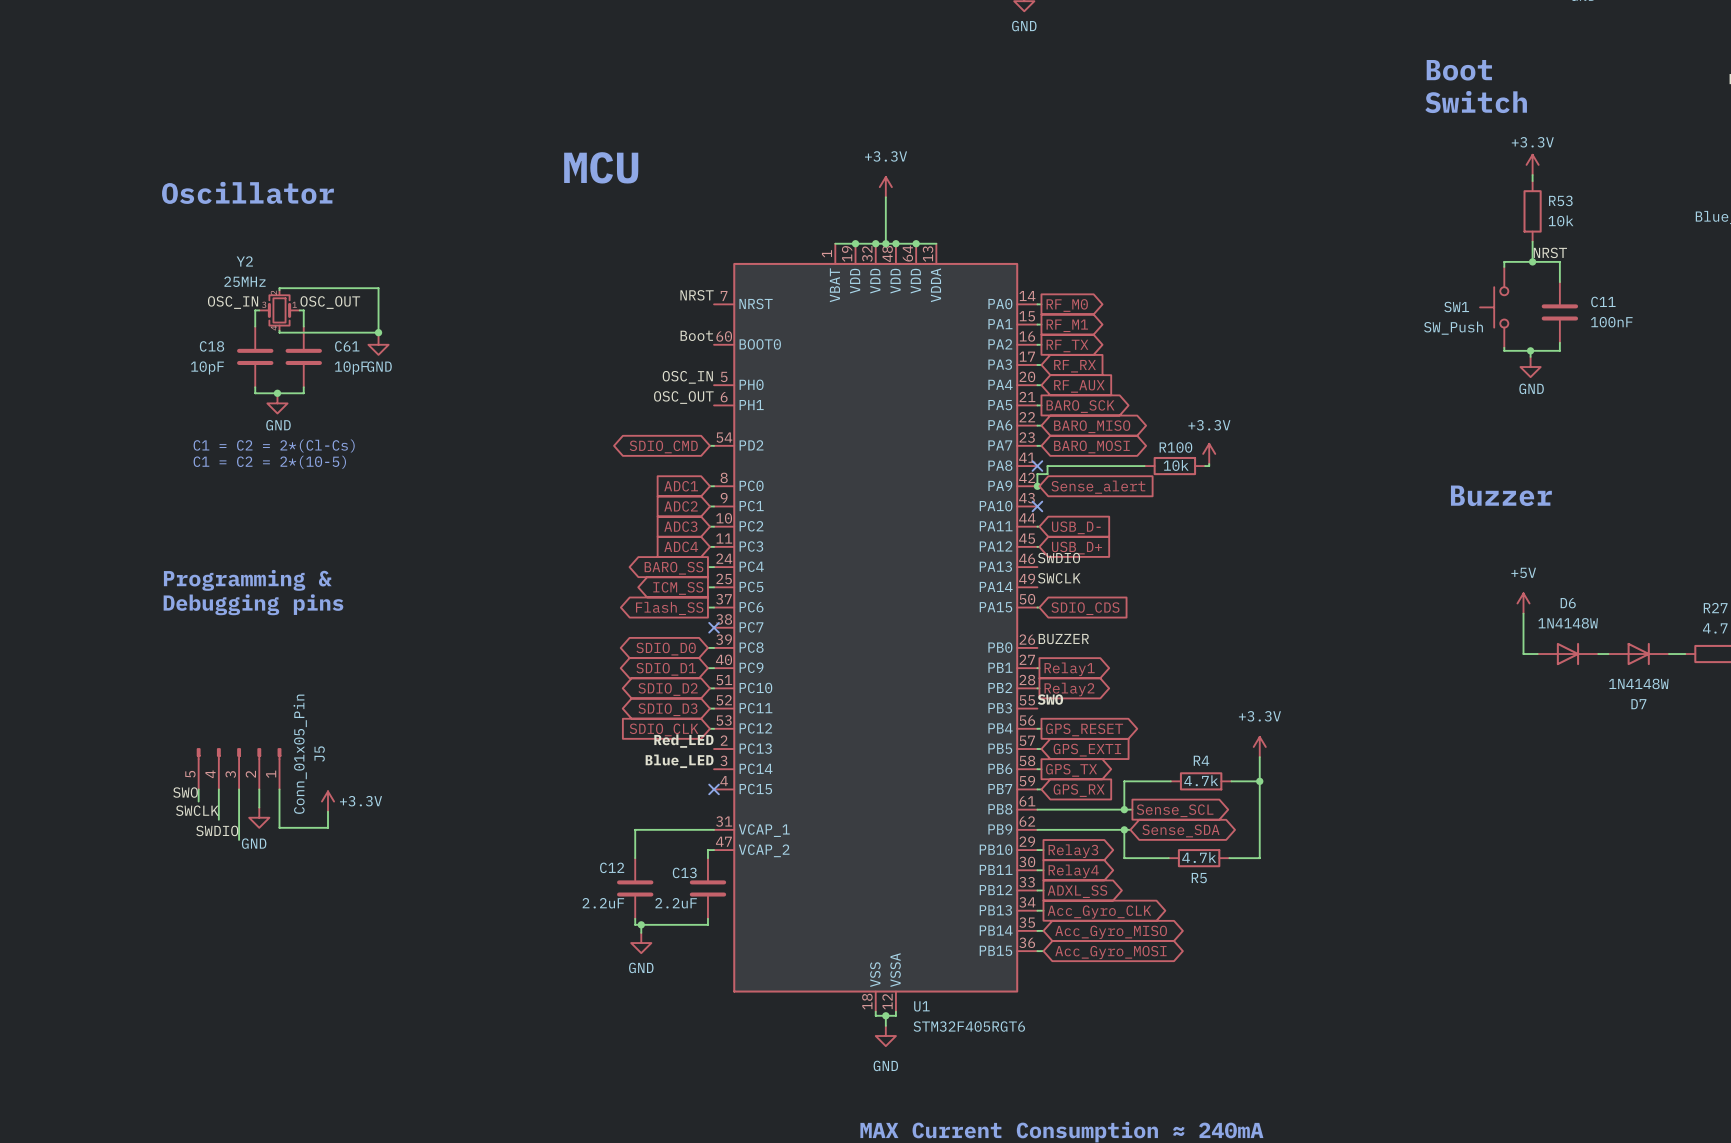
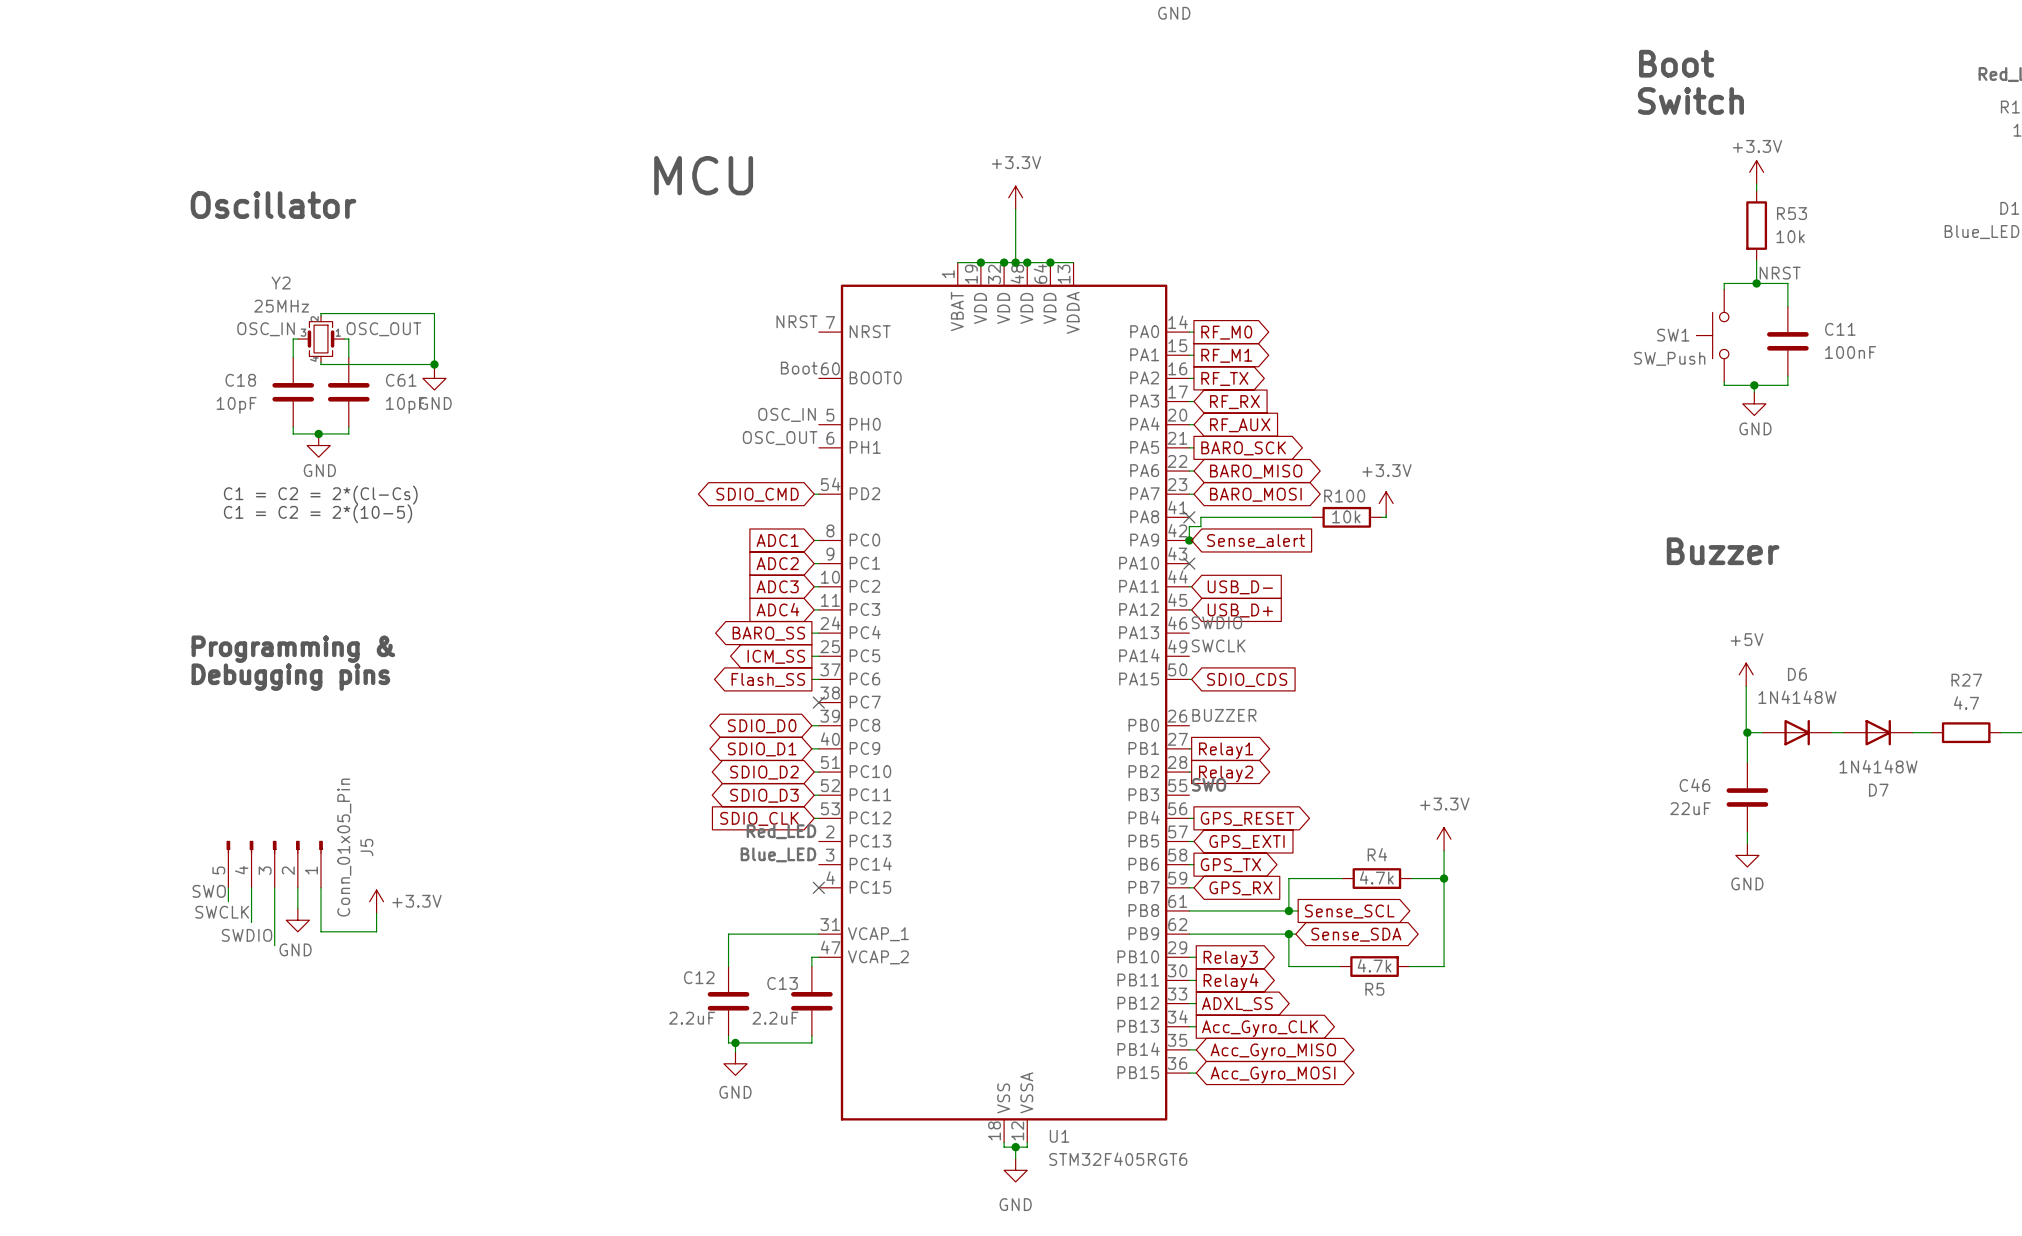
wire: none -> (1747, 732) (1747, 762)
junction: none -> (1747, 732)
C46: none -> 22uF (1747, 797)
wire: none -> (1747, 832) (1747, 843)
power symbol: none -> GND (1747, 855)

